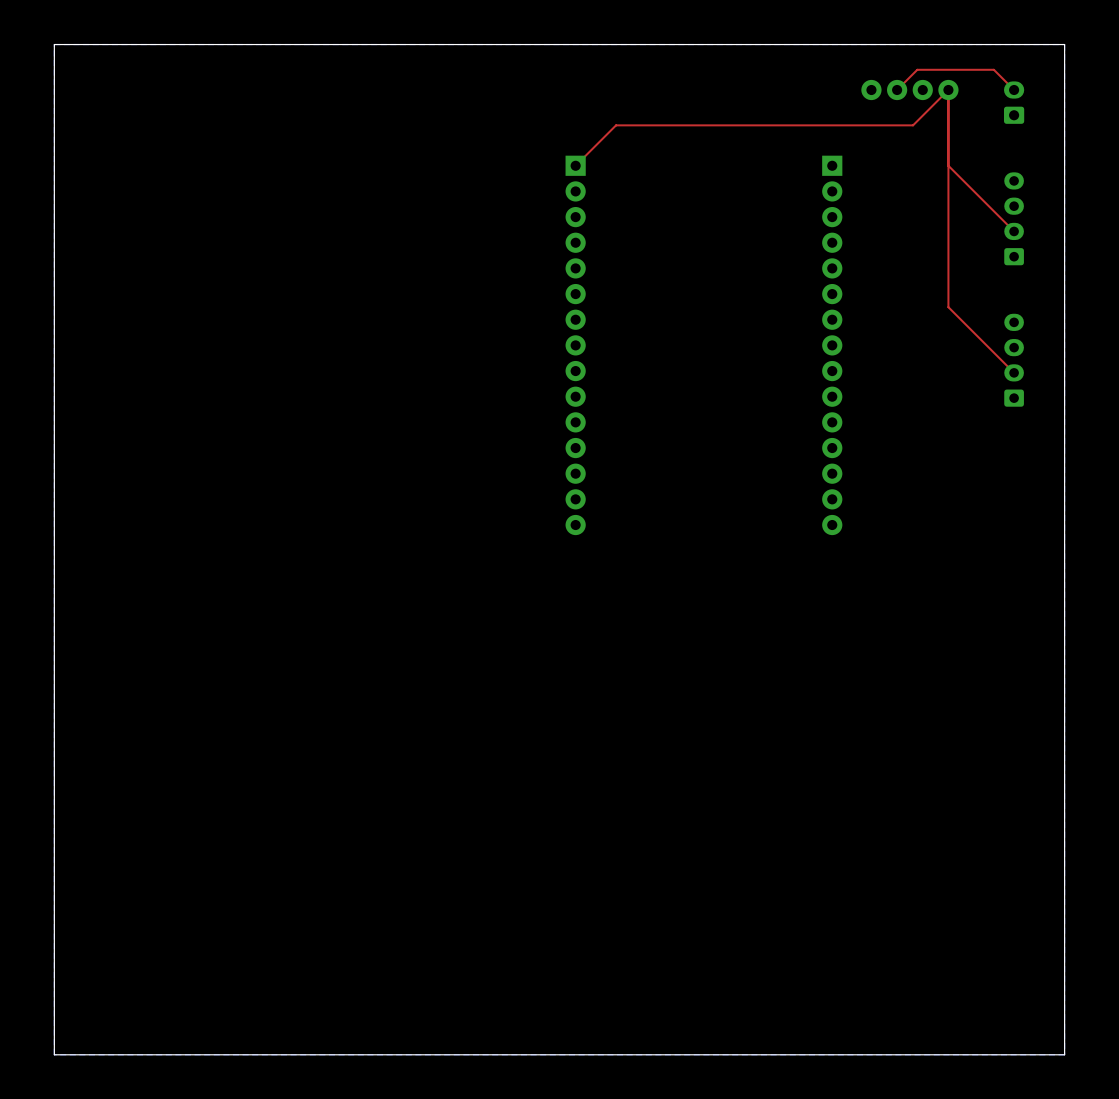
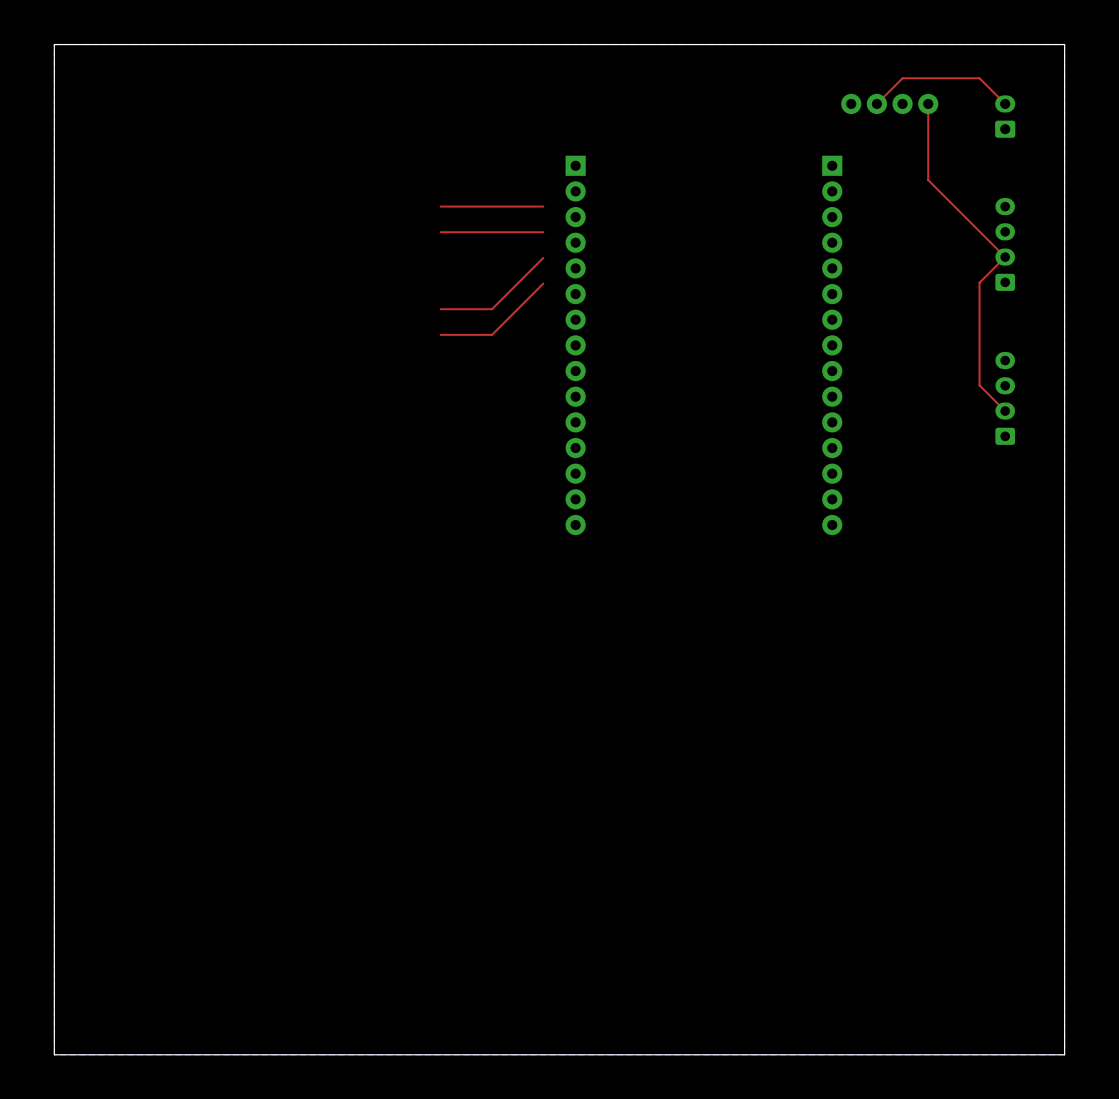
part position: (909, 90) -> (889, 103)
top track: (1014, 90) (993, 69) (917, 69) (897, 90) -> none
part position: (1014, 102) -> (1005, 116)
top track: none -> (928, 103) (928, 180) (1005, 257) (979, 282) (979, 385) (1005, 411)
top track: none -> (1005, 103) (979, 78) (902, 78) (876, 103)
top track: (575, 165) (616, 125) (913, 125) (948, 90) (948, 307) (1014, 372) -> none
top track: (948, 165) (1014, 231) -> none
top track: none -> (543, 206) (440, 206)
part position: (1014, 218) -> (1005, 244)
top track: none -> (543, 232) (440, 232)
top track: none -> (543, 257) (492, 309) (440, 309)
top track: none -> (543, 283) (492, 334) (440, 334)
part position: (1014, 360) -> (1005, 398)

